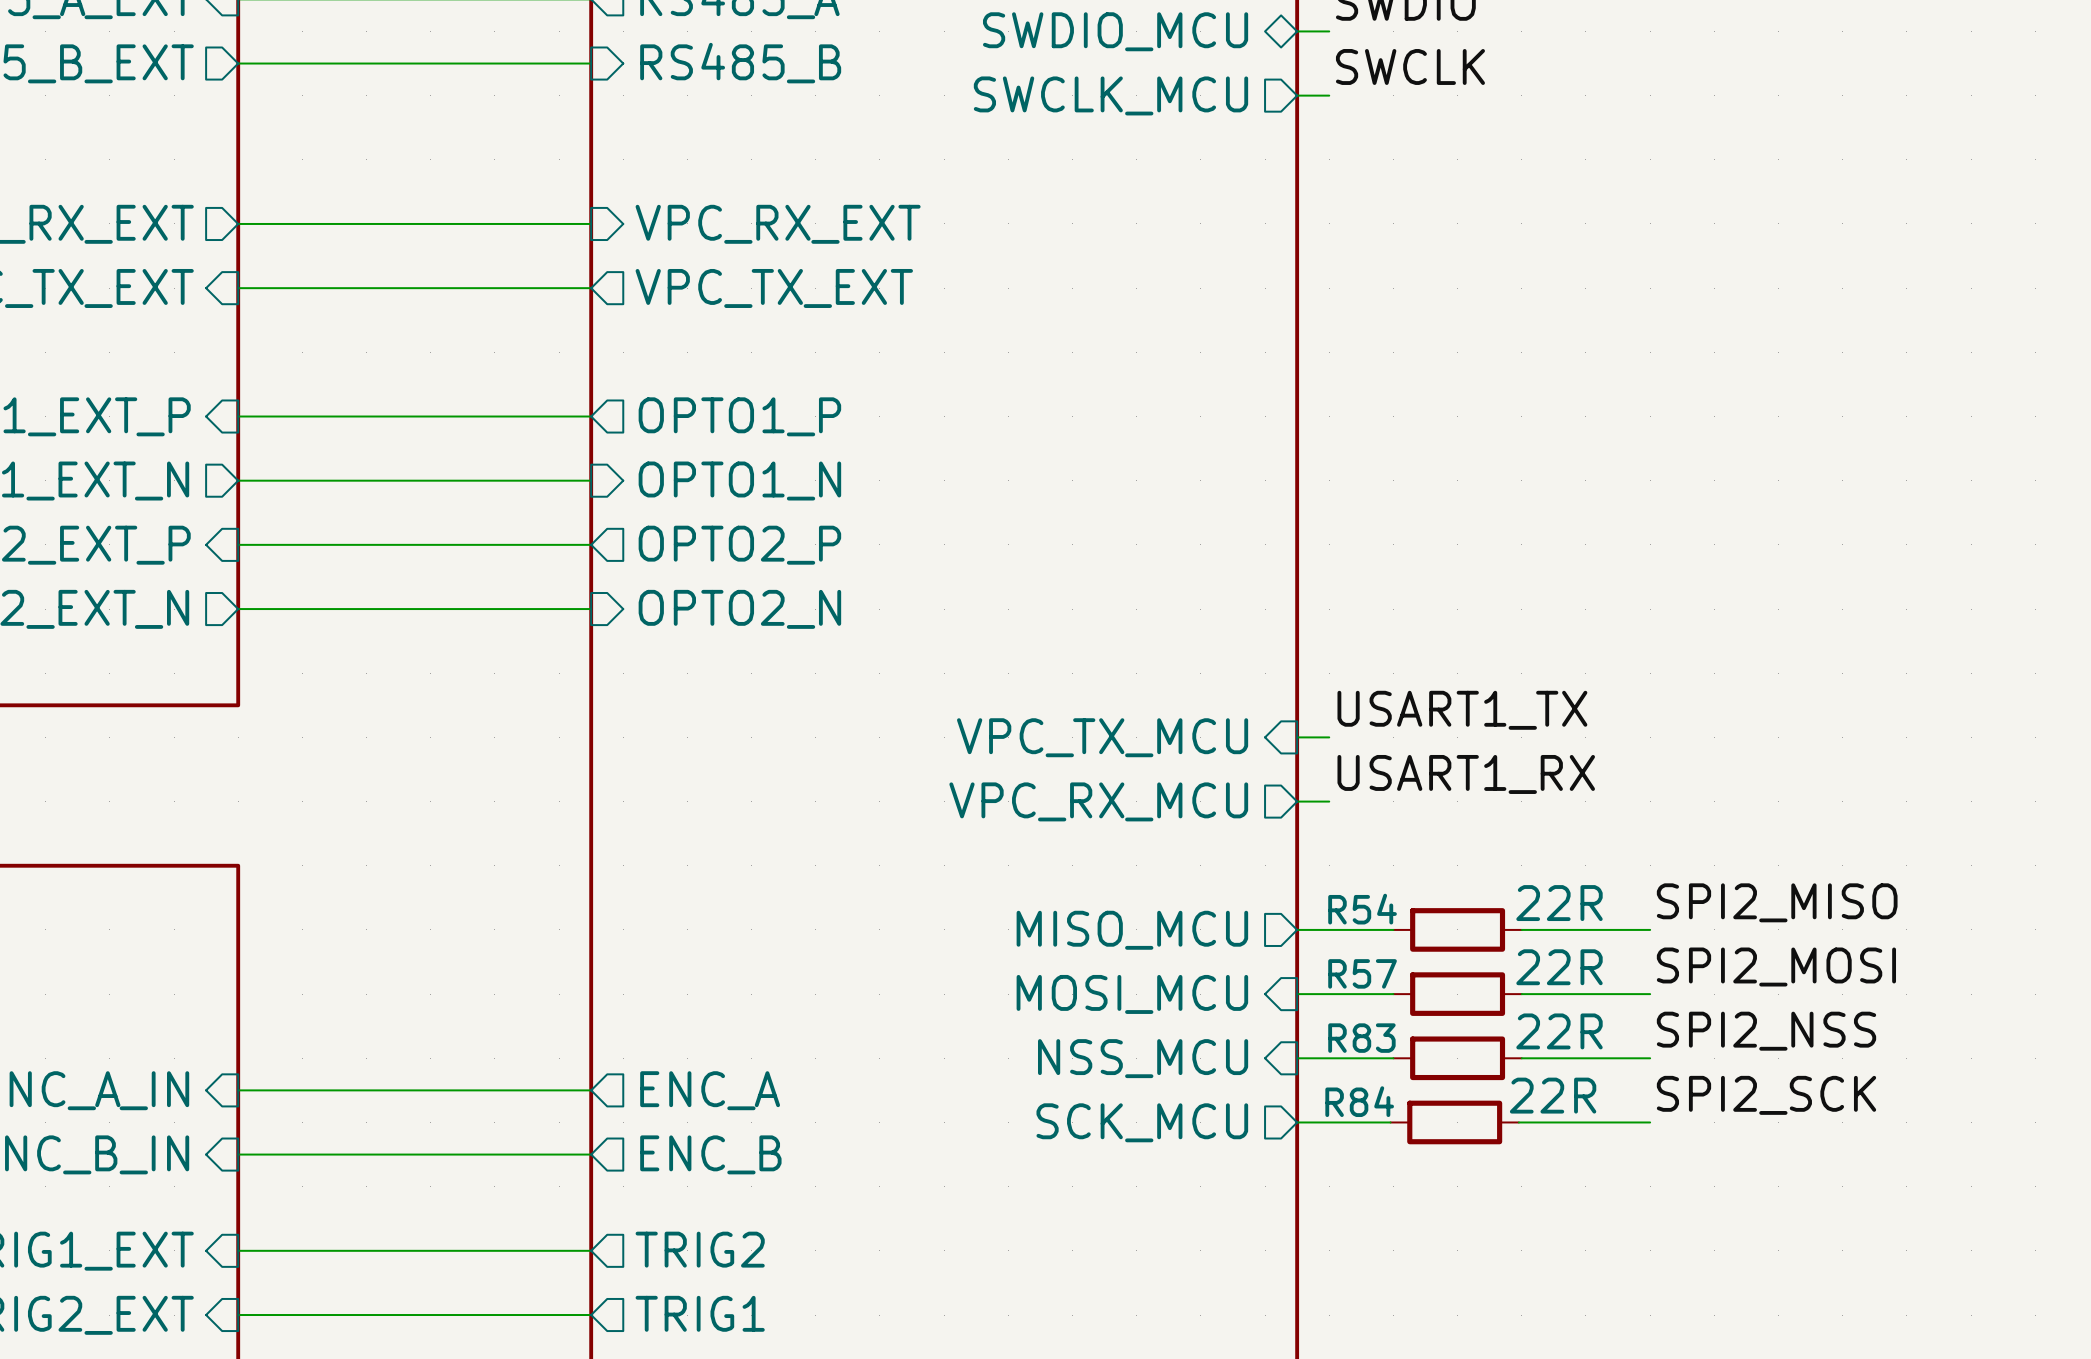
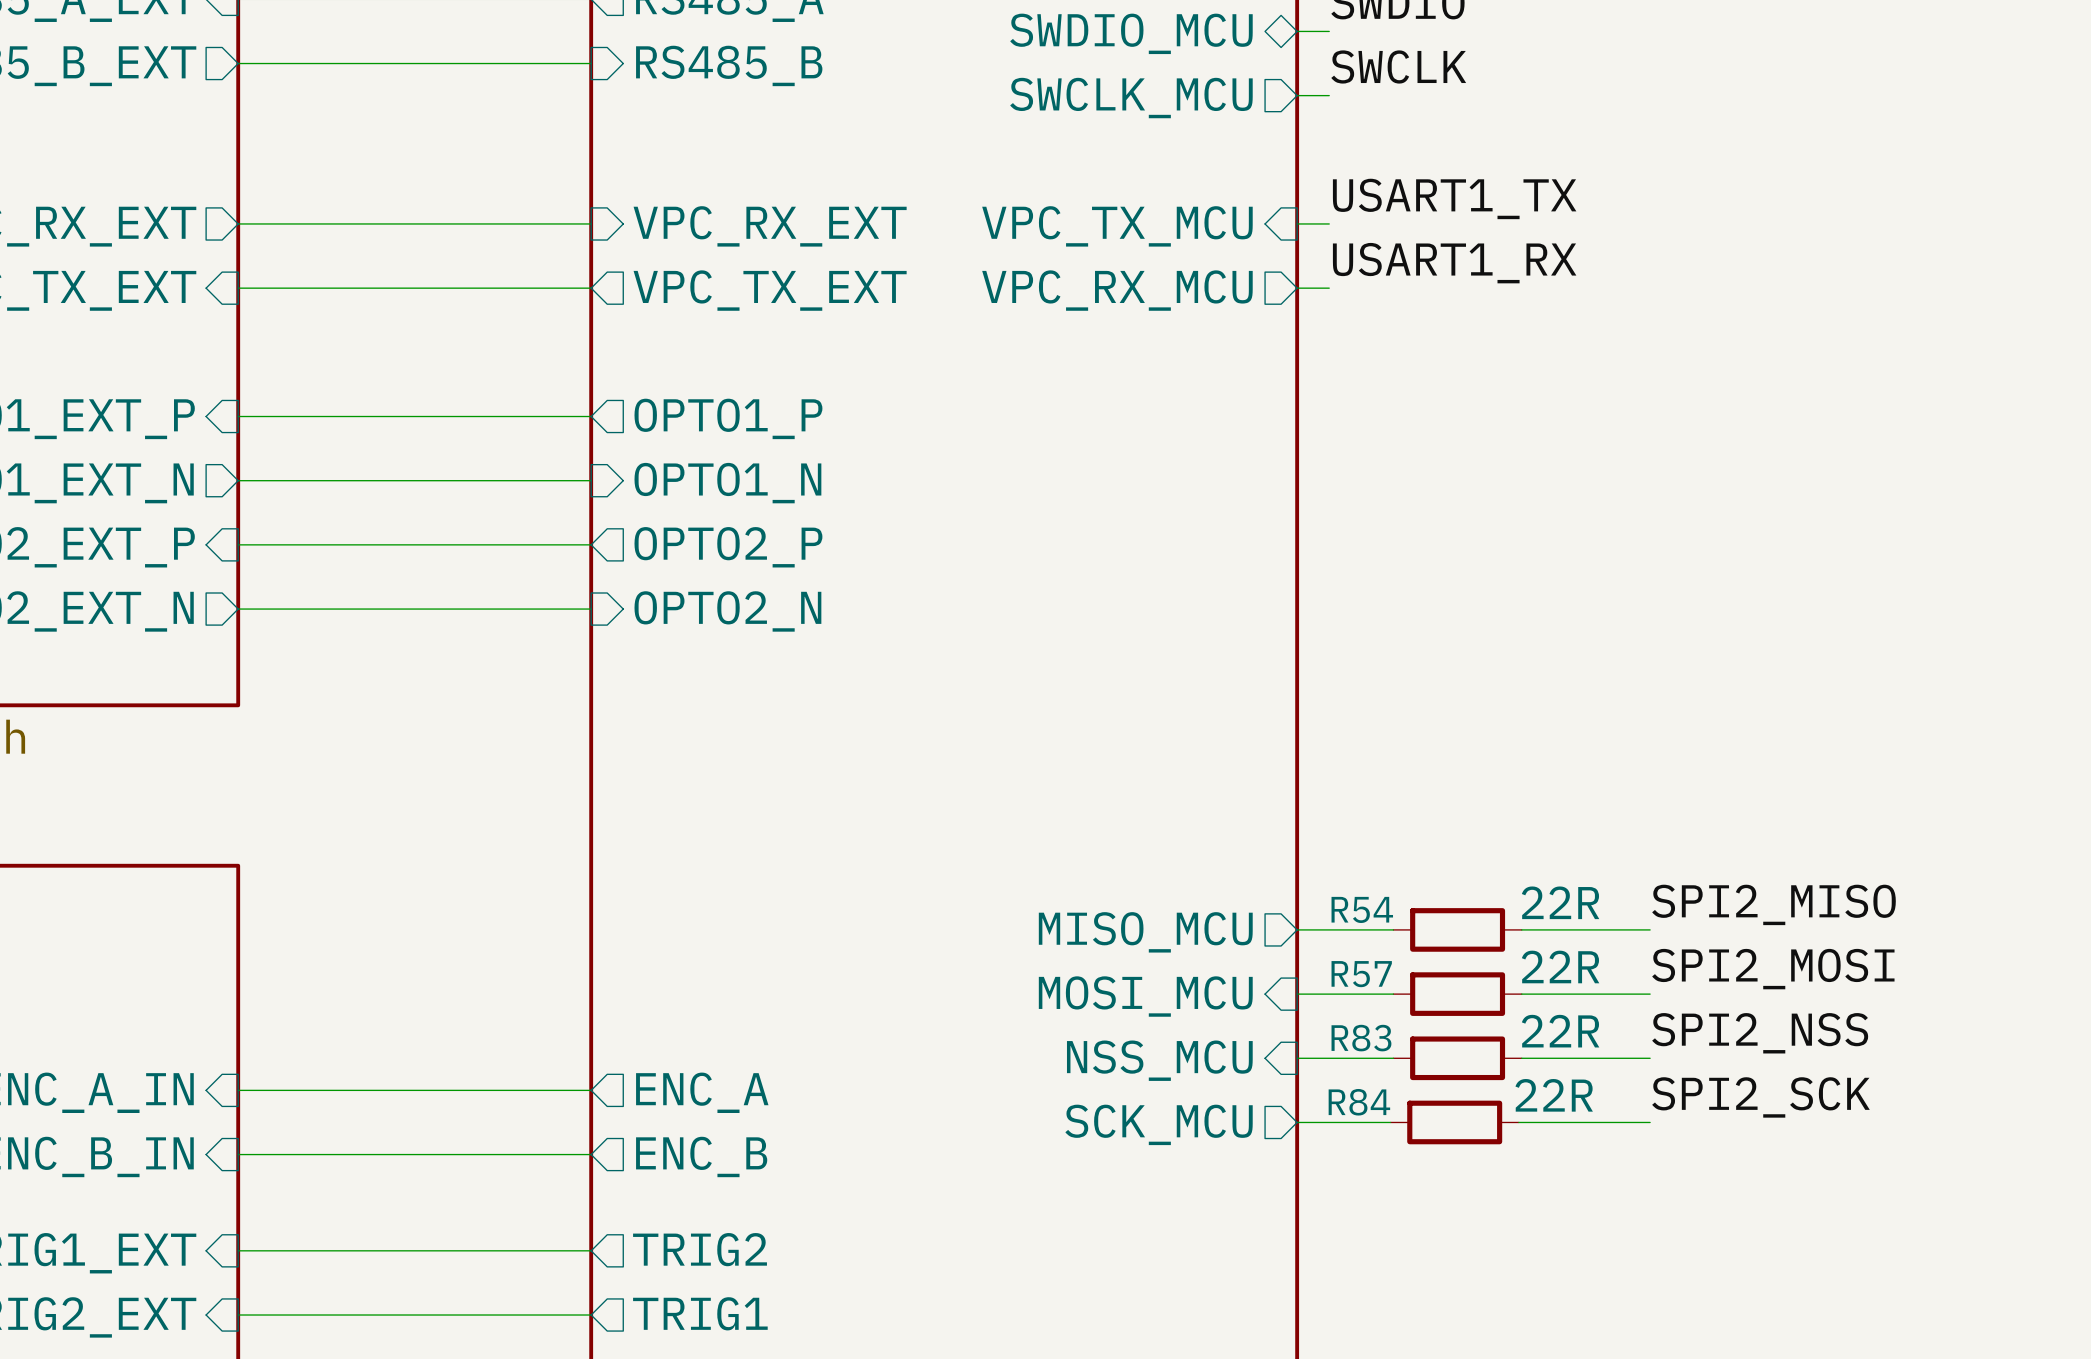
label position: USART1_TX (1462, 710) -> USART1_TX (1454, 198)
sheet pin position: VPC_TX_MCU (1102, 737) -> VPC_TX_MCU (1117, 226)
wire: (1297, 737) (1329, 737) -> (1297, 288) (1329, 288)
label position: USART1_RX (1466, 774) -> USART1_RX (1454, 263)
sheet pin position: VPC_RX_MCU (1098, 801) -> VPC_RX_MCU (1117, 290)
wire: (1297, 801) (1329, 801) -> (1297, 223) (1329, 223)

